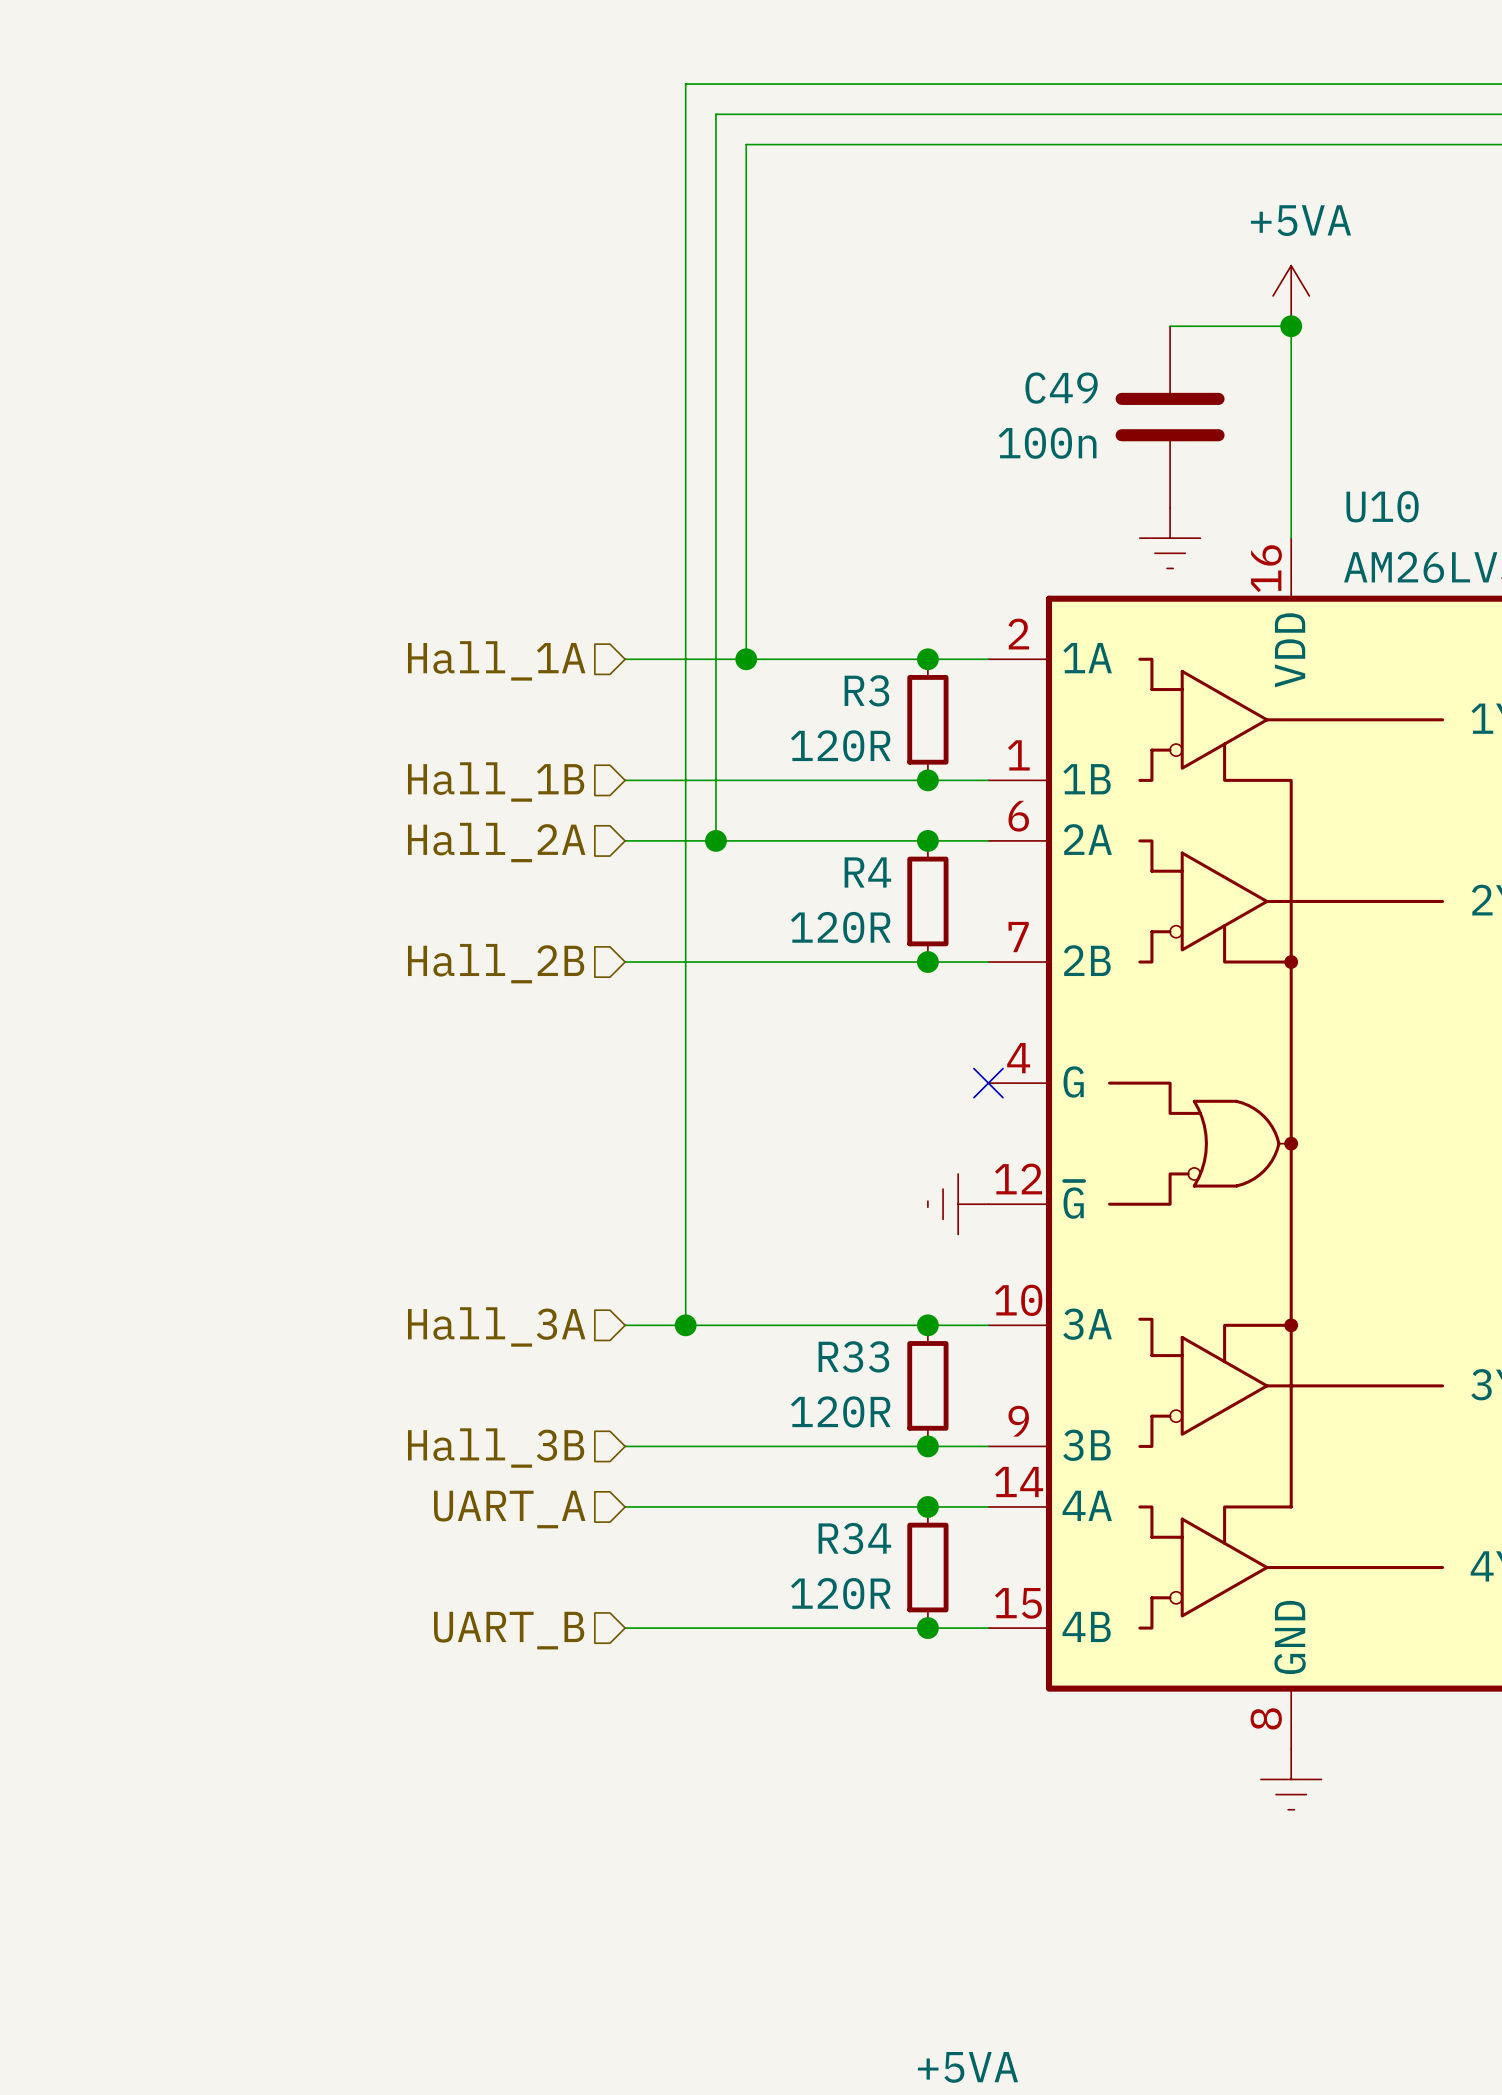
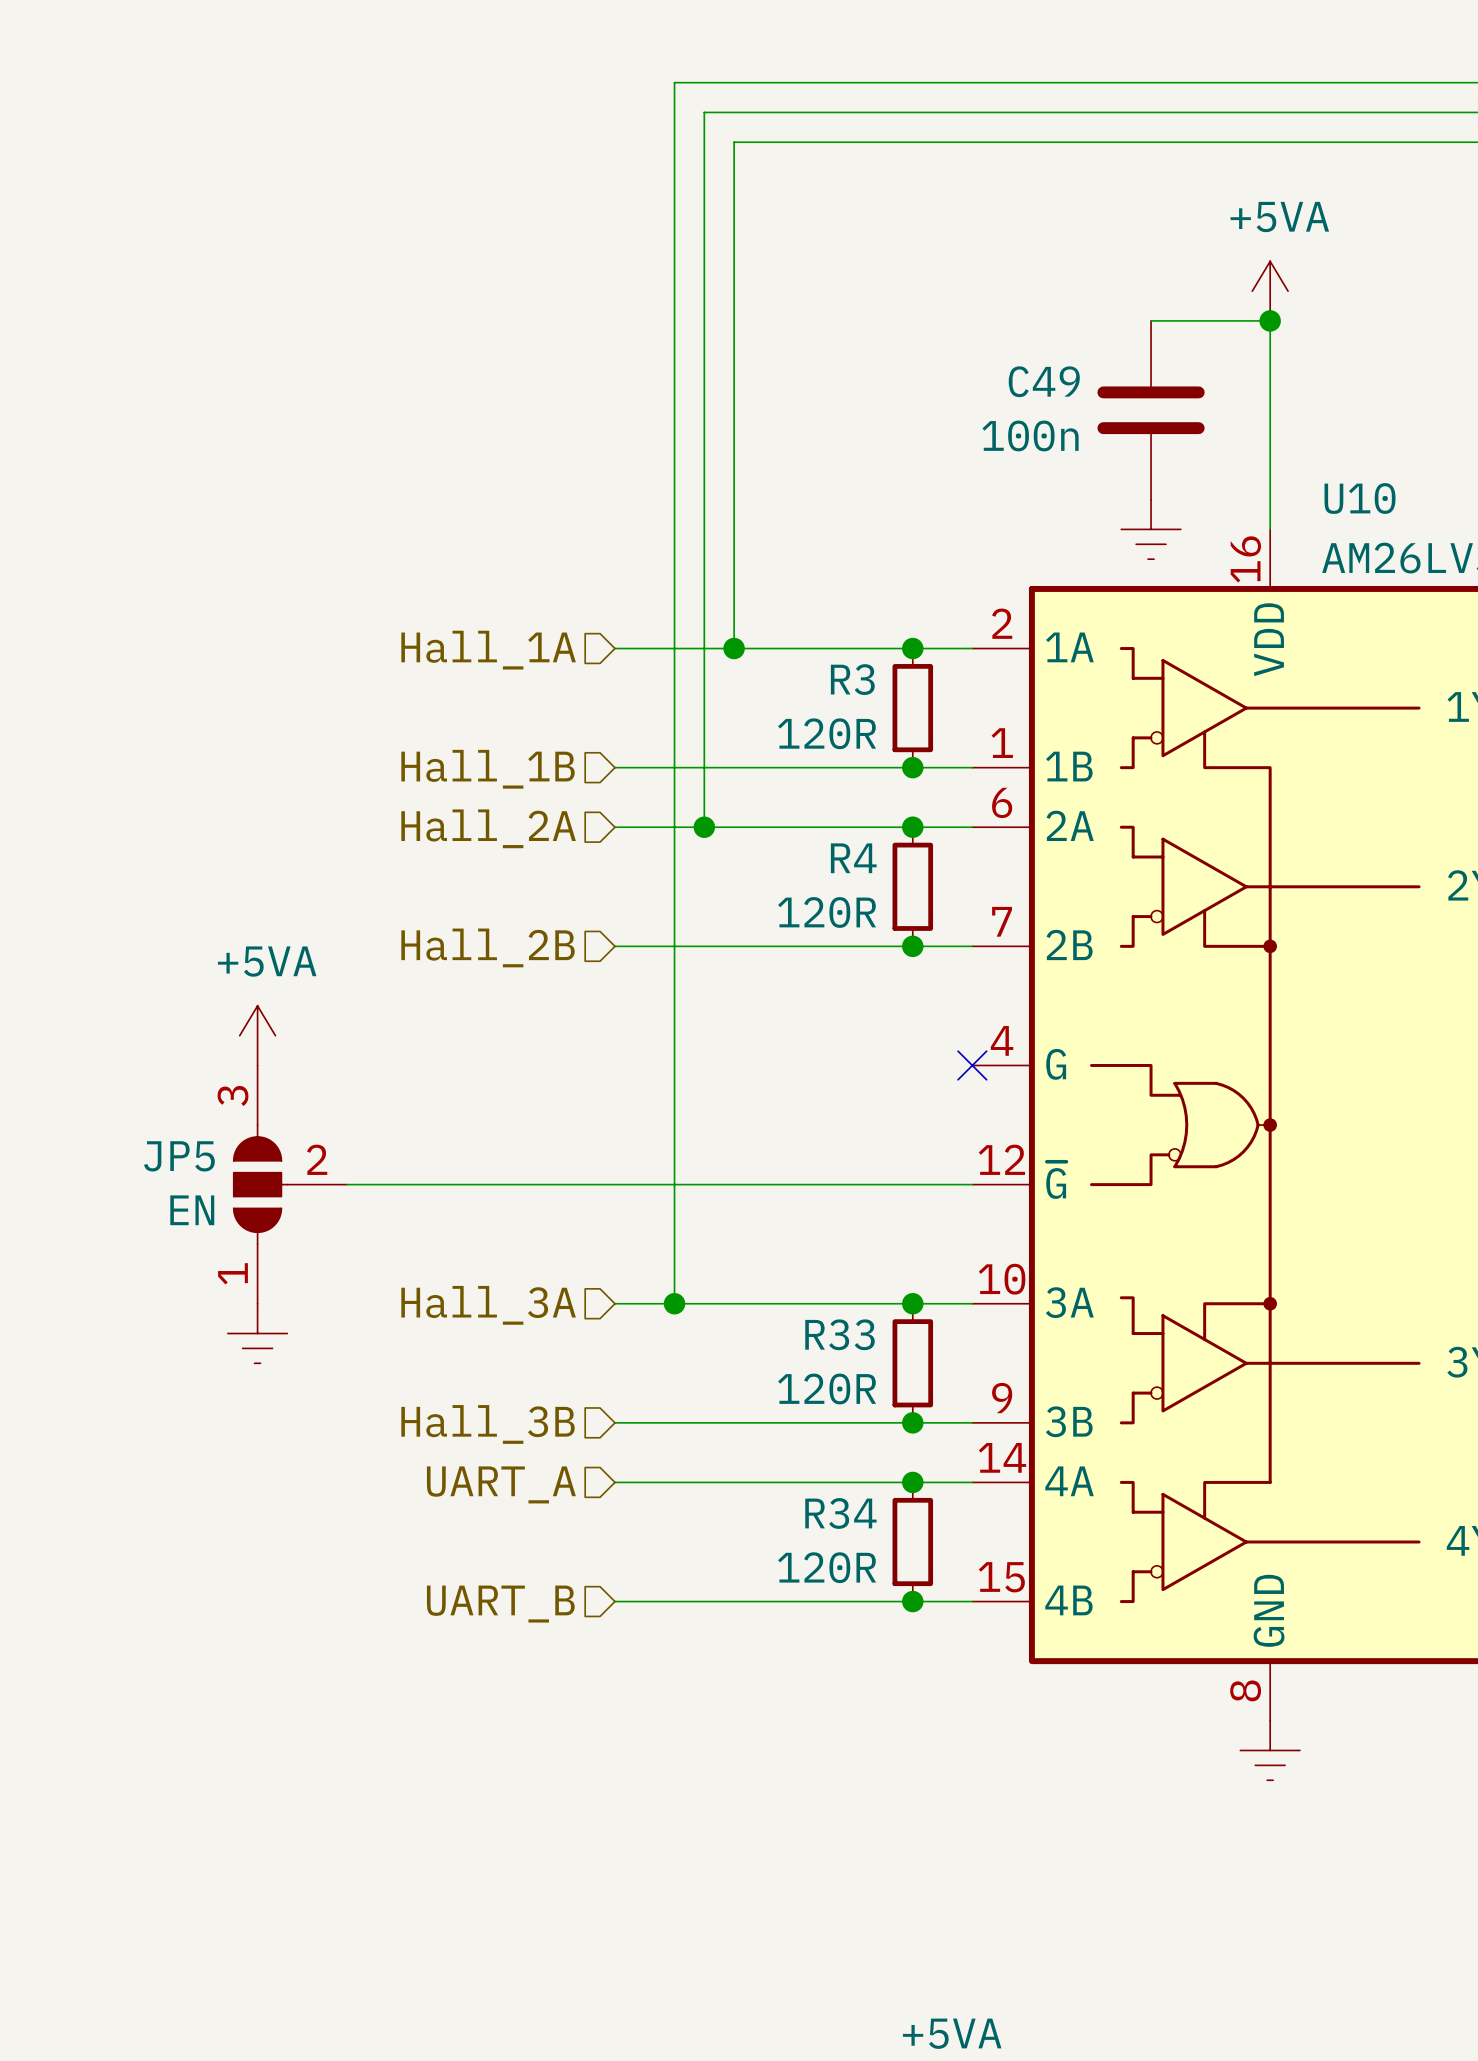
power symbol: none -> +5VA (257, 1035)
JP5: none -> EN (290, 1184)
wire: none -> (346, 1184) (972, 1184)
power symbol: (958, 1204) -> none
power symbol: none -> (257, 1333)

